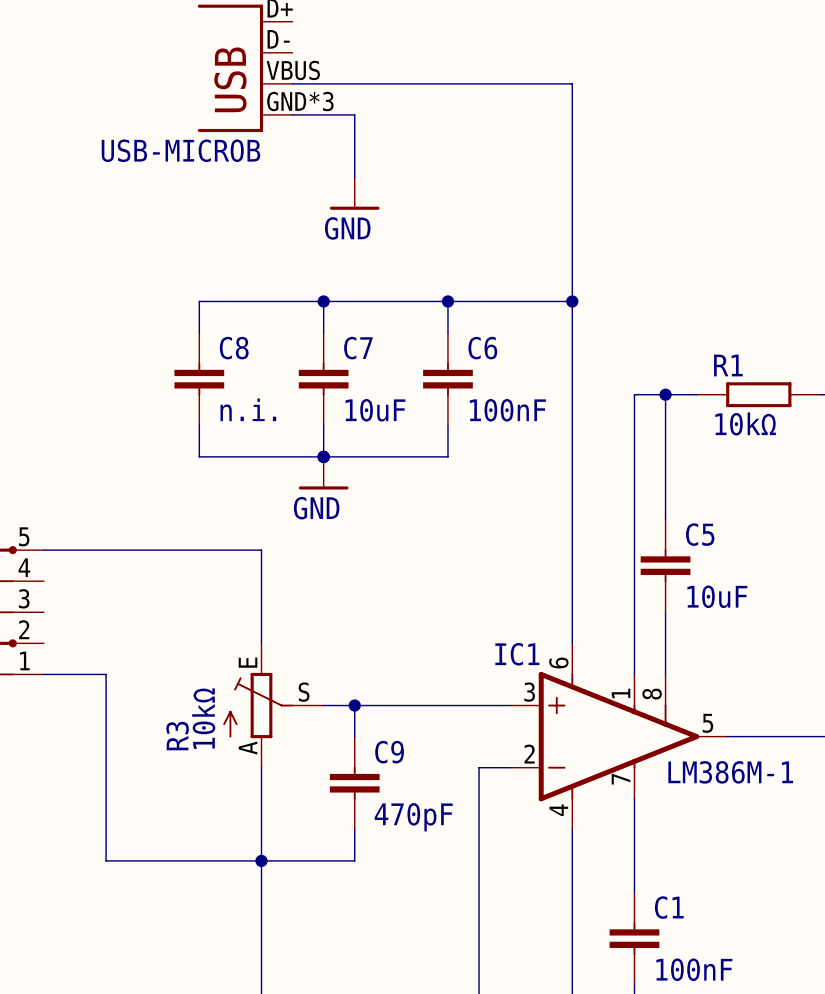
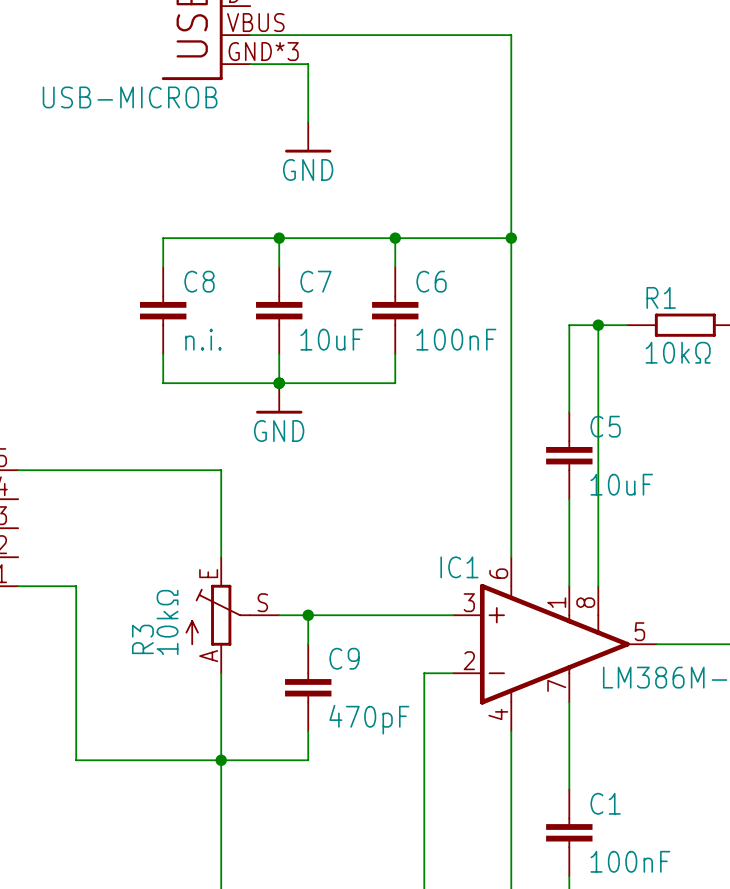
C5 position: (665, 565) -> (569, 455)

